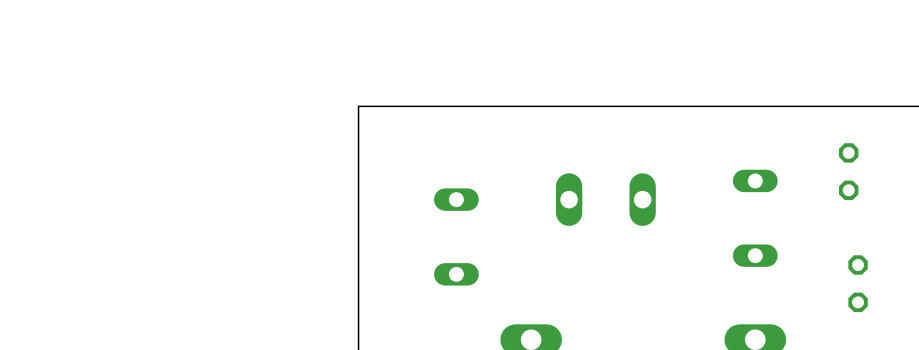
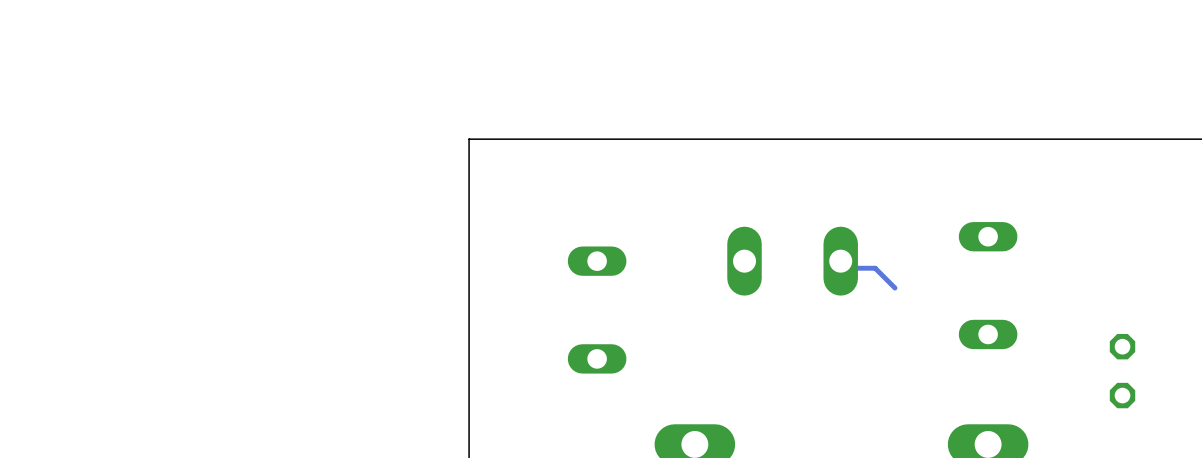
part: (848, 171) -> none
track: none -> (840, 261) (848, 268) (875, 268) (895, 288)

